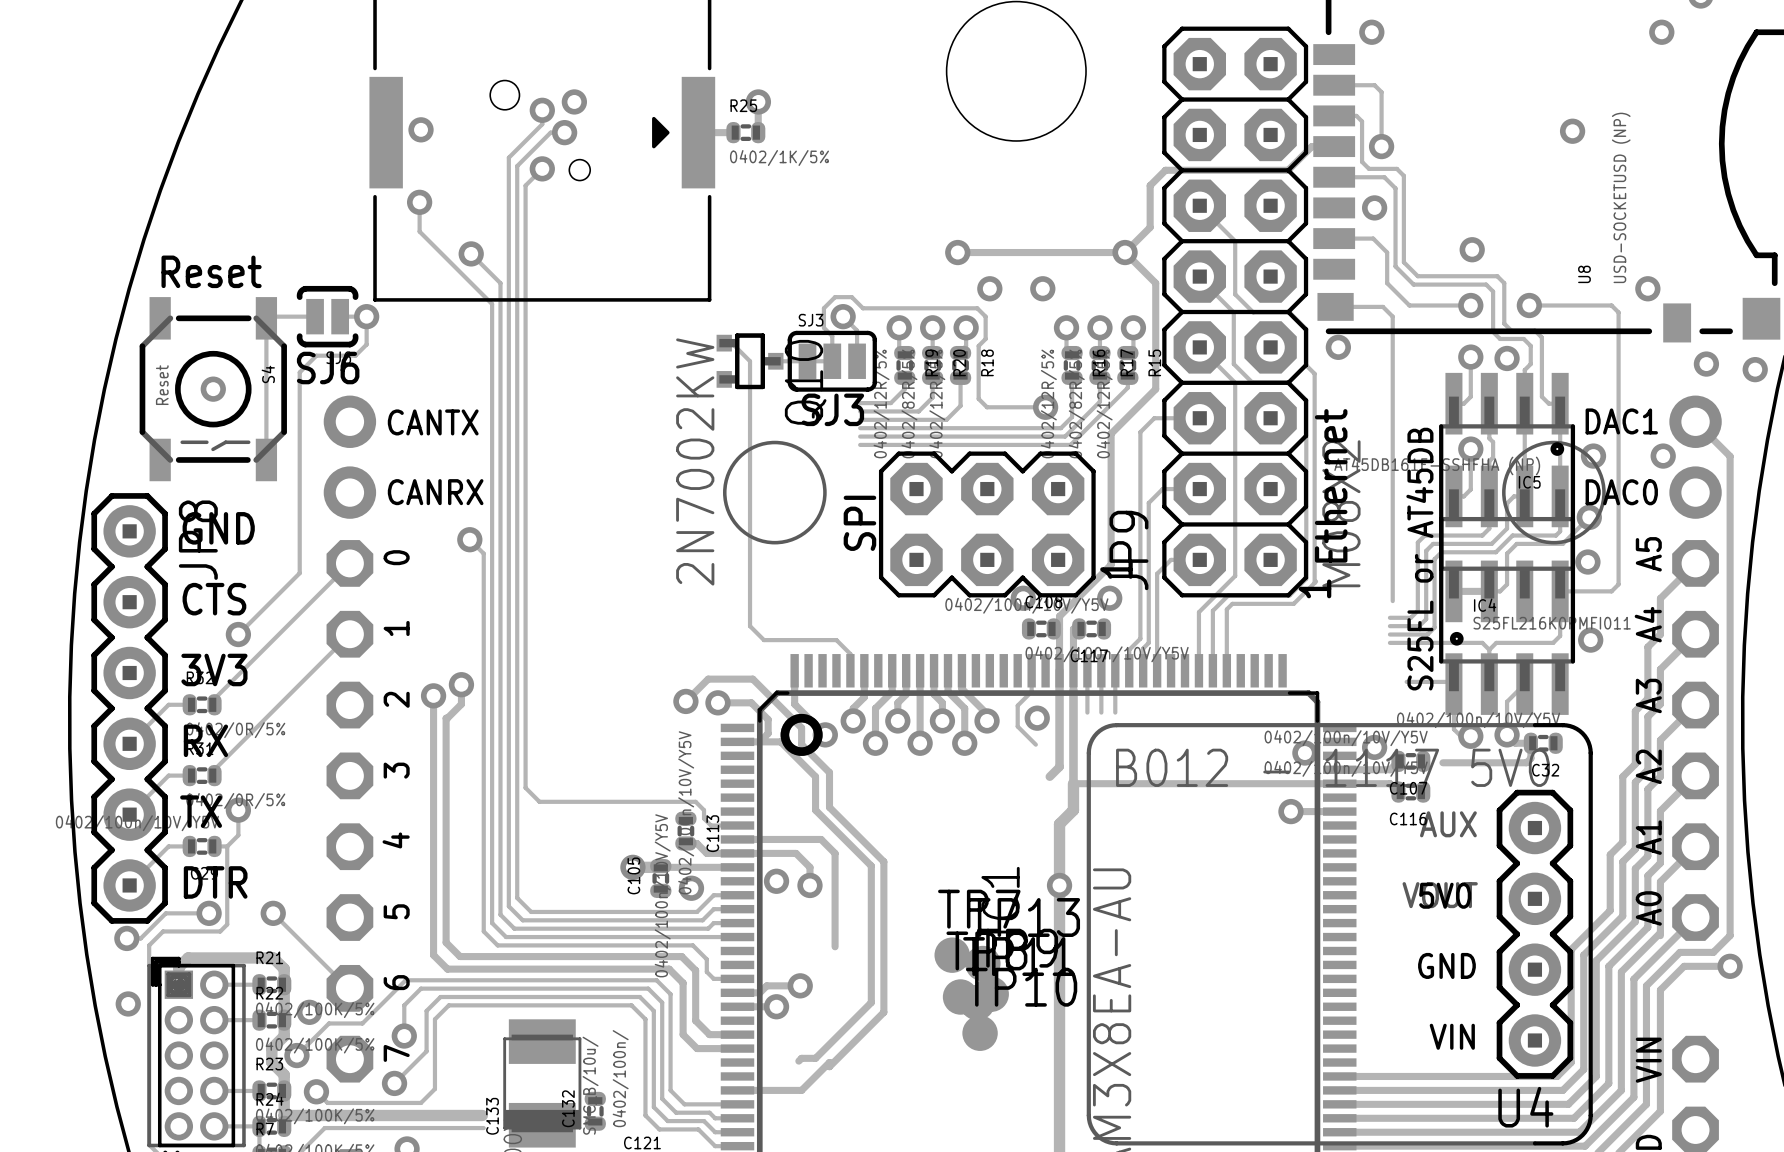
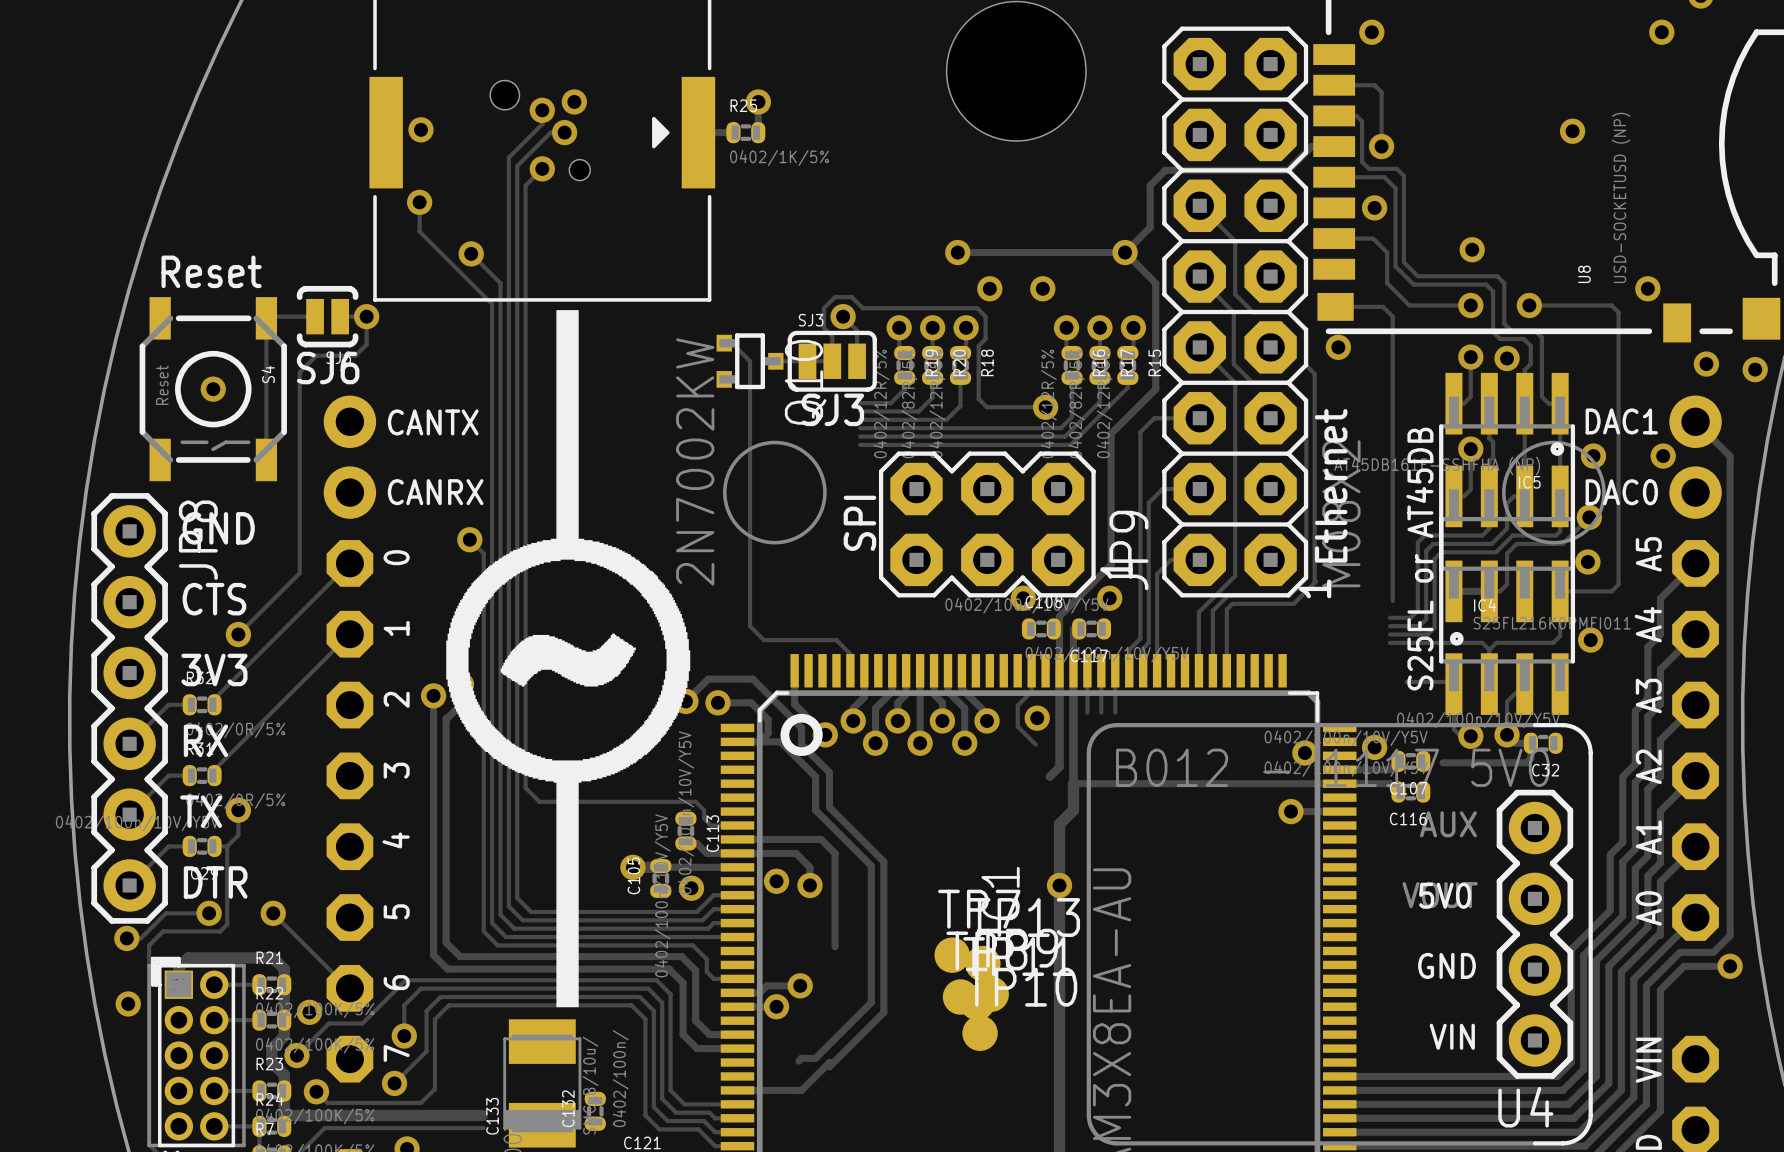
drawing: none -> [446, 310, 691, 1008]

